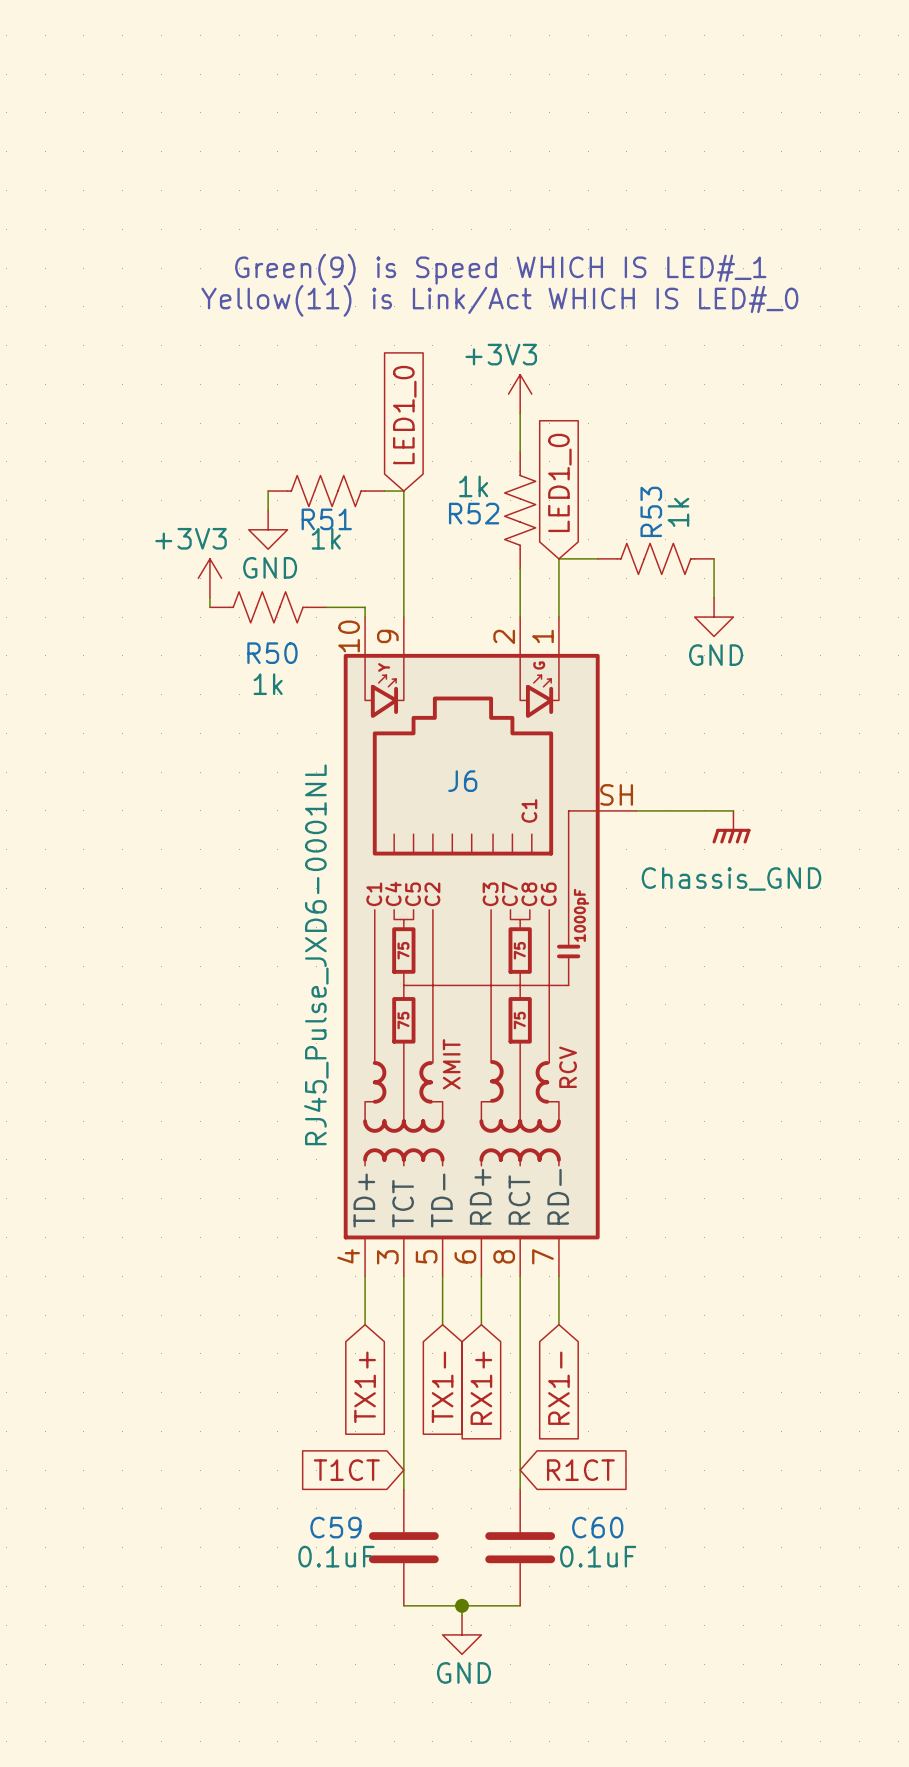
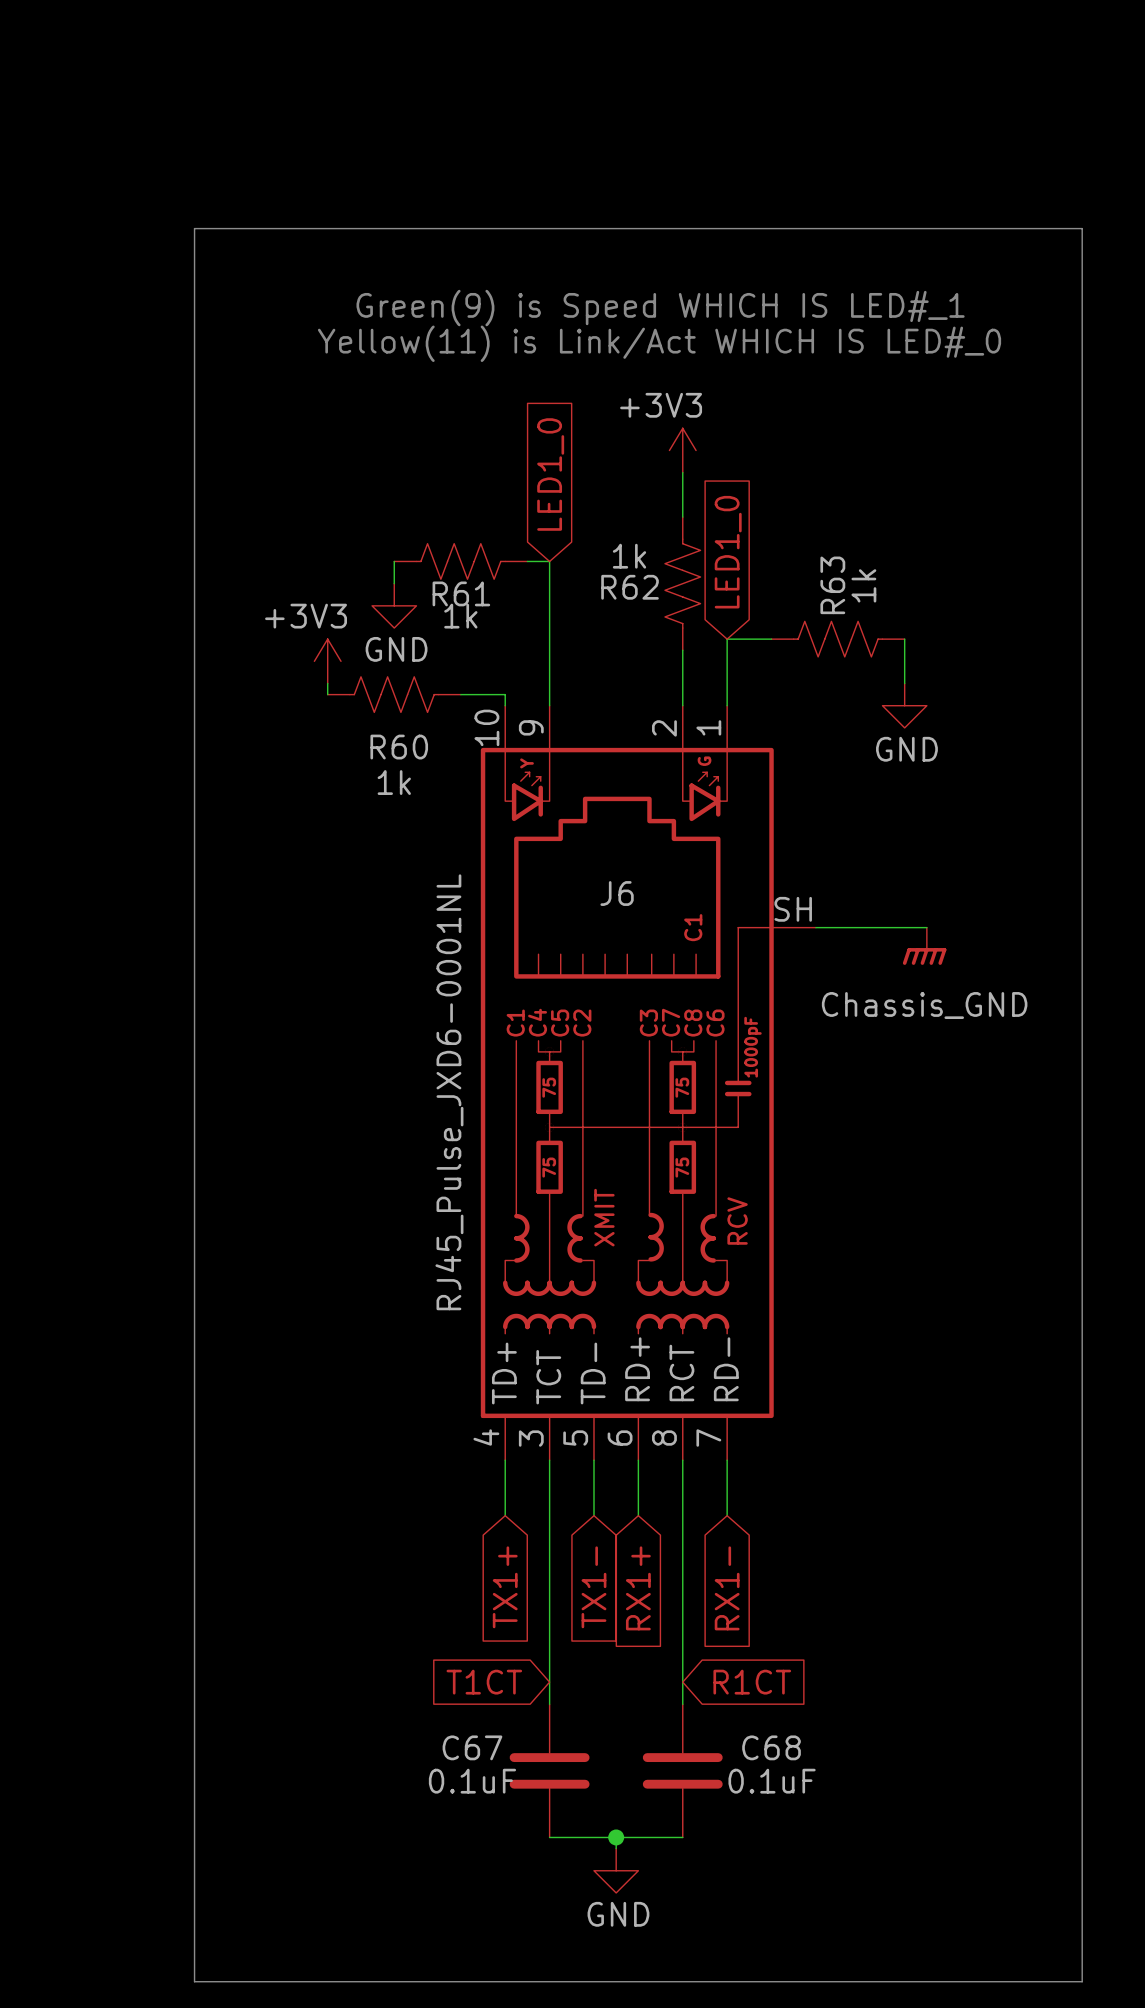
line: none -> (194, 228) (1082, 228) (1082, 1981) (194, 1981) (194, 228)
R53 name: R53 (651, 511) -> R63 (832, 585)
R52 name: R52 (474, 513) -> R62 (630, 587)
R51 name: R51 (326, 519) -> R61 (461, 593)
R50 name: R50 (272, 653) -> R60 (399, 747)
C59 name: C59 (335, 1527) -> C67 (472, 1747)
C60 name: C60 (597, 1527) -> C68 (771, 1747)

